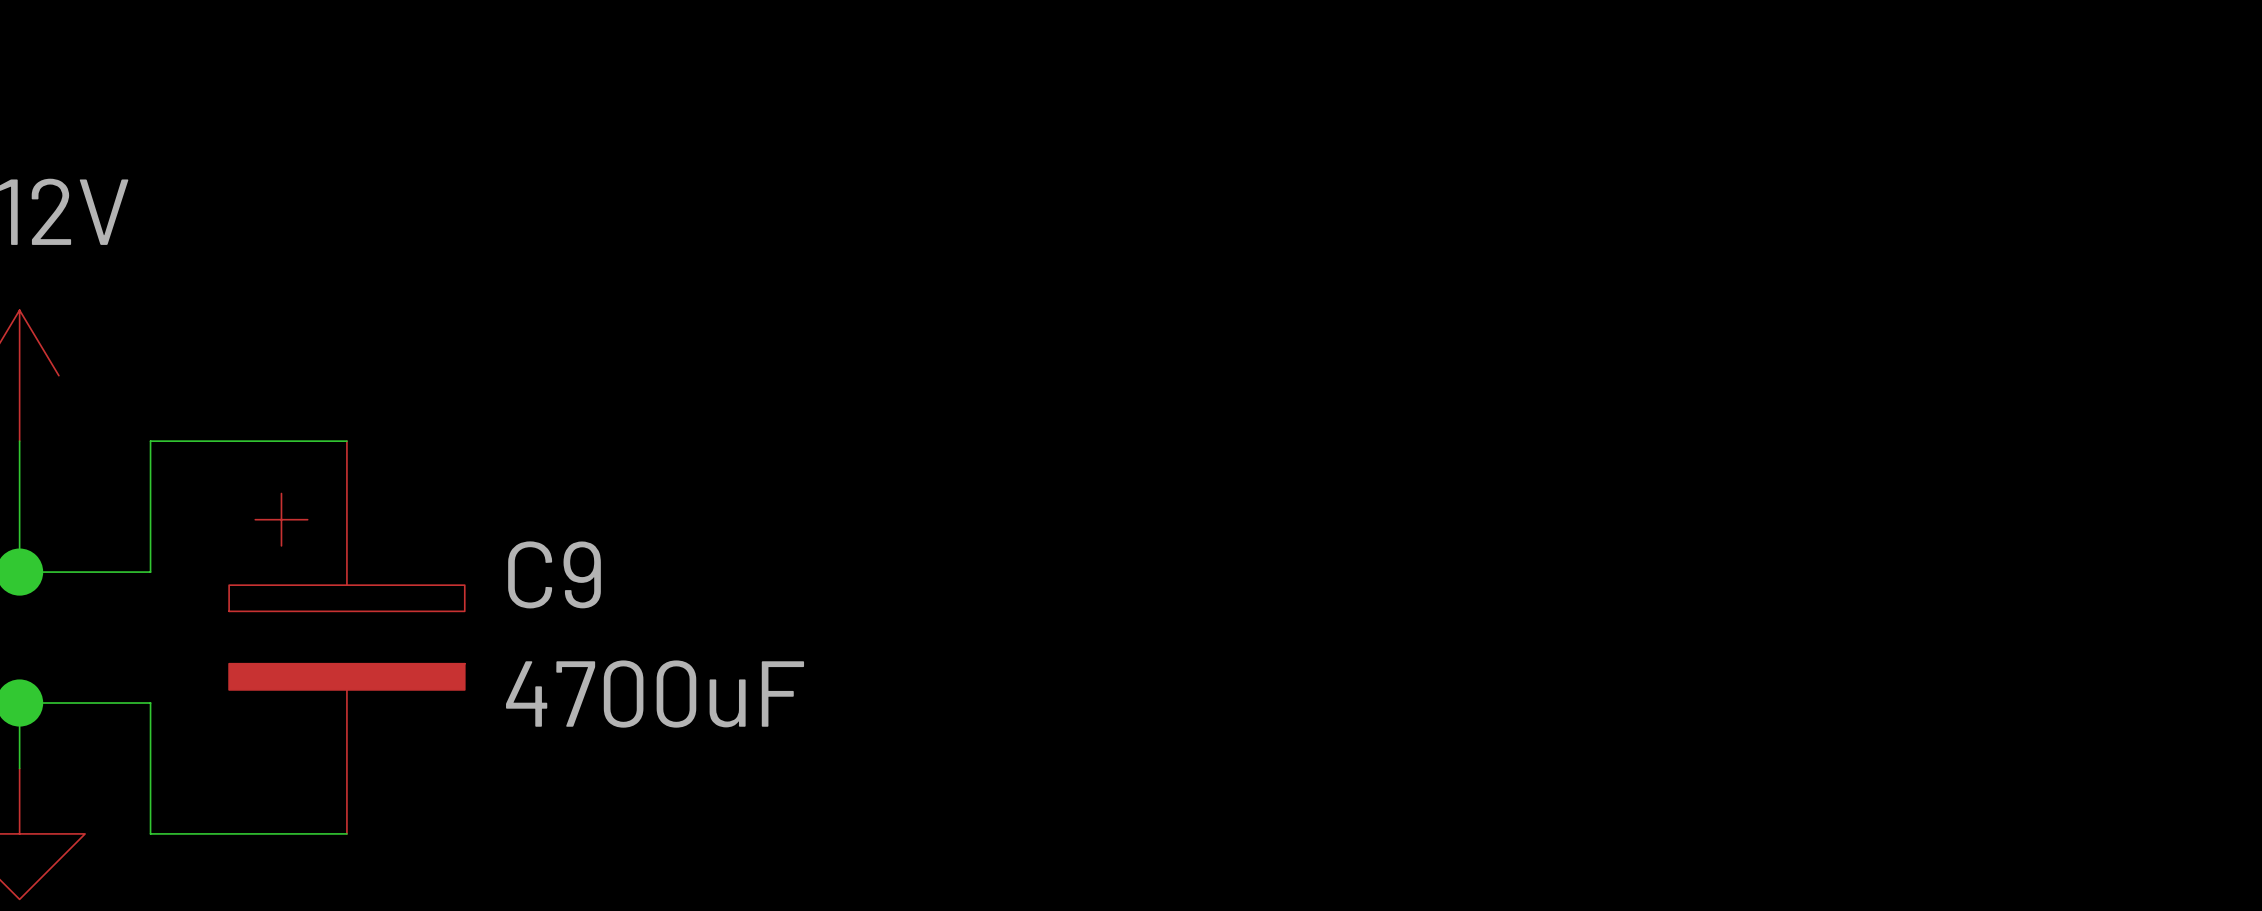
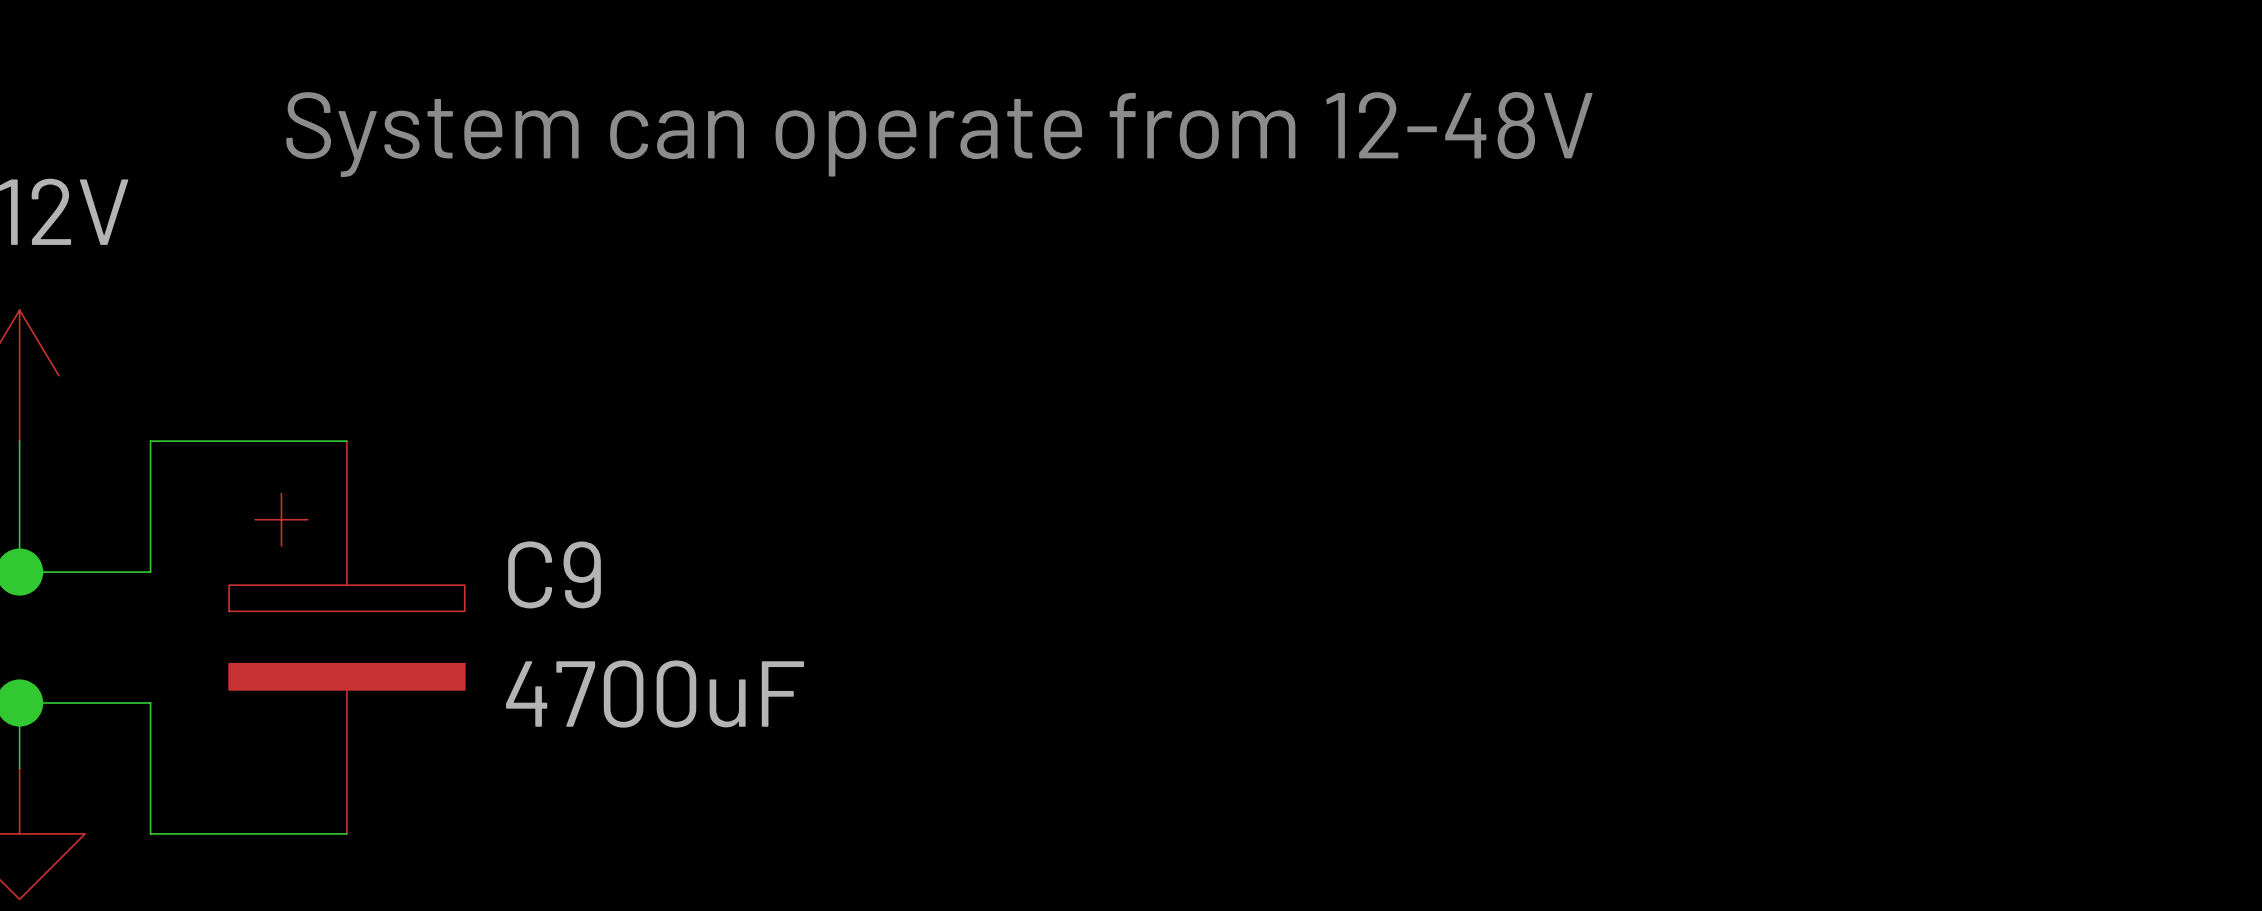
text: none -> System can operate from 12-48V (939, 134)

